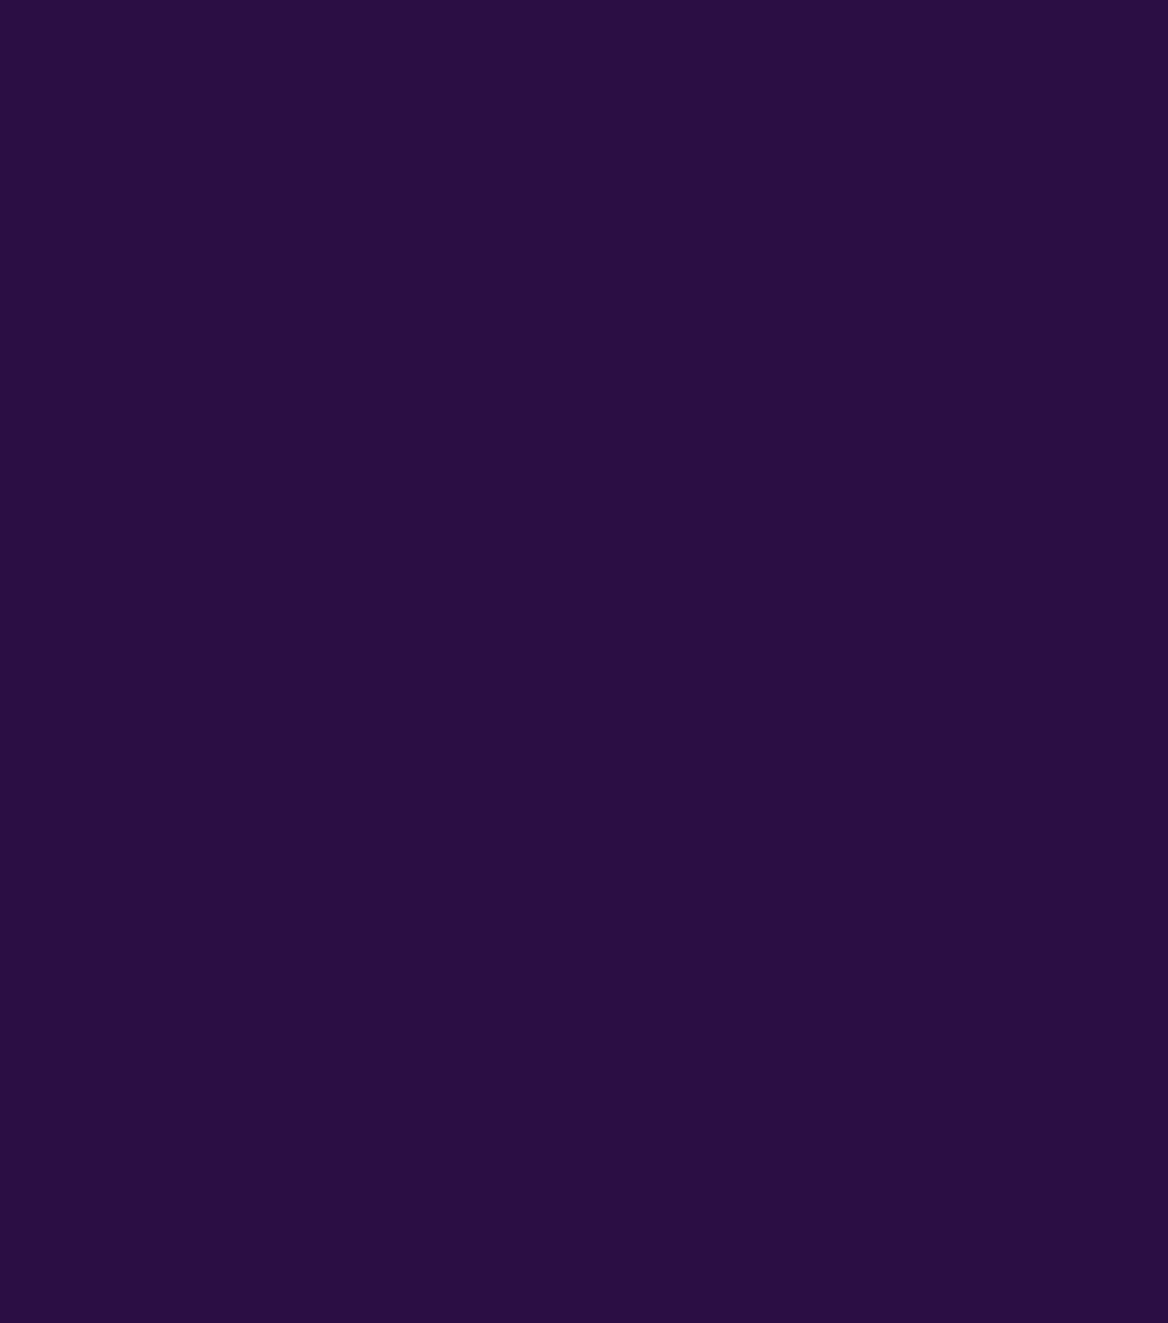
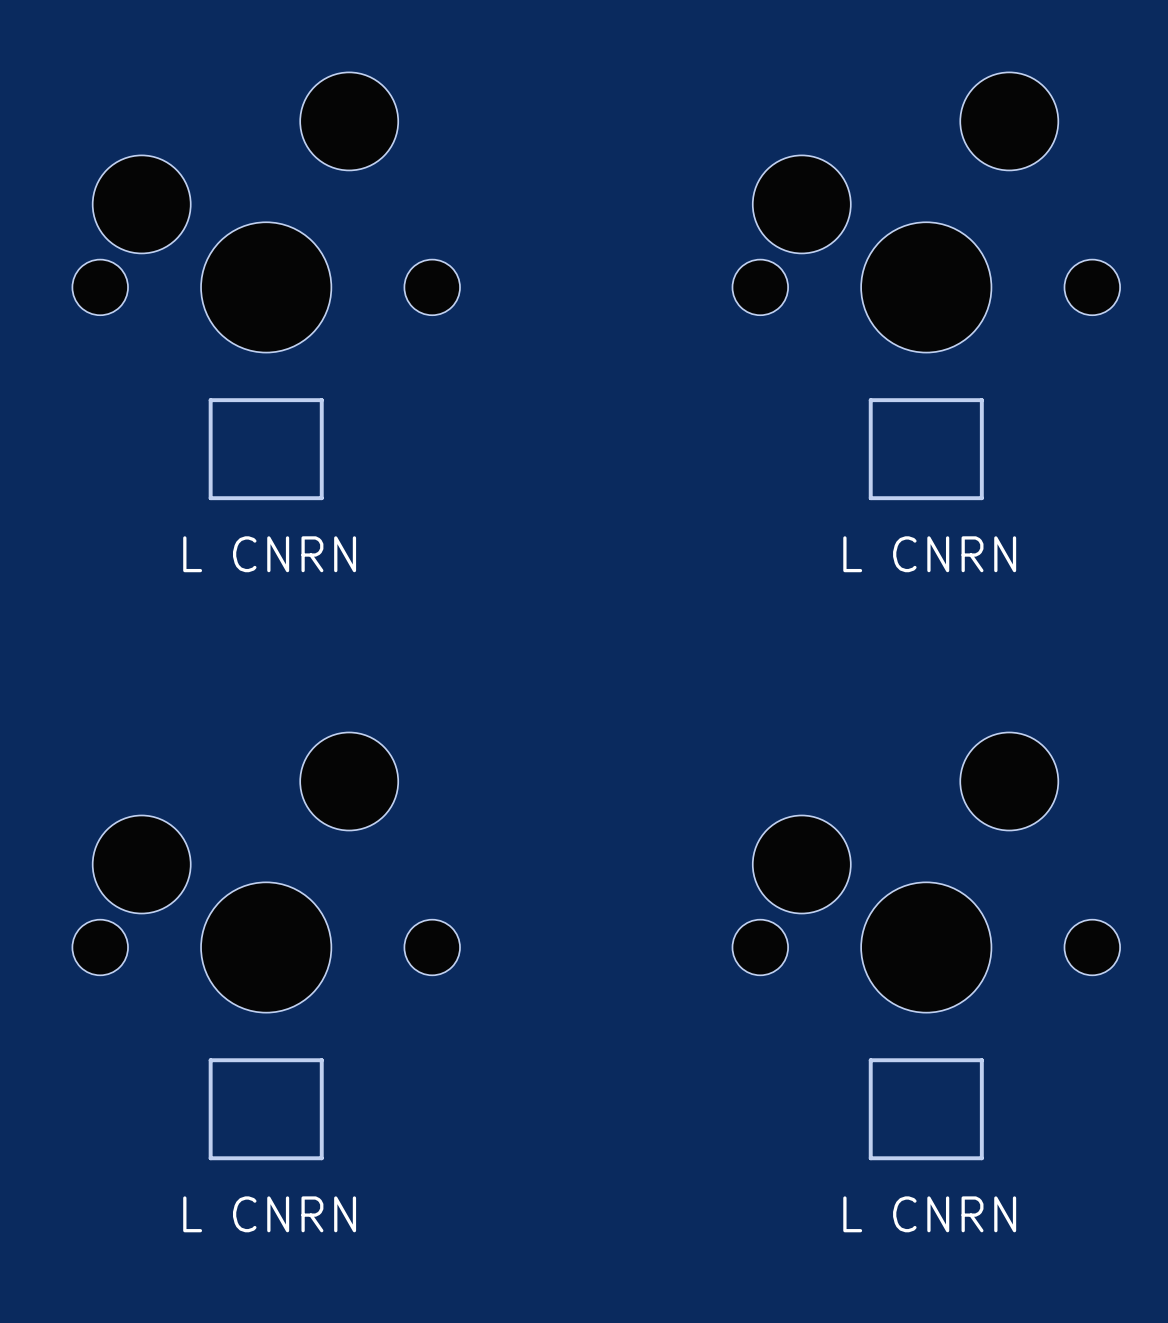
part: none -> (266, 286)
part: none -> (926, 286)
part: none -> (266, 946)
part: none -> (926, 946)

